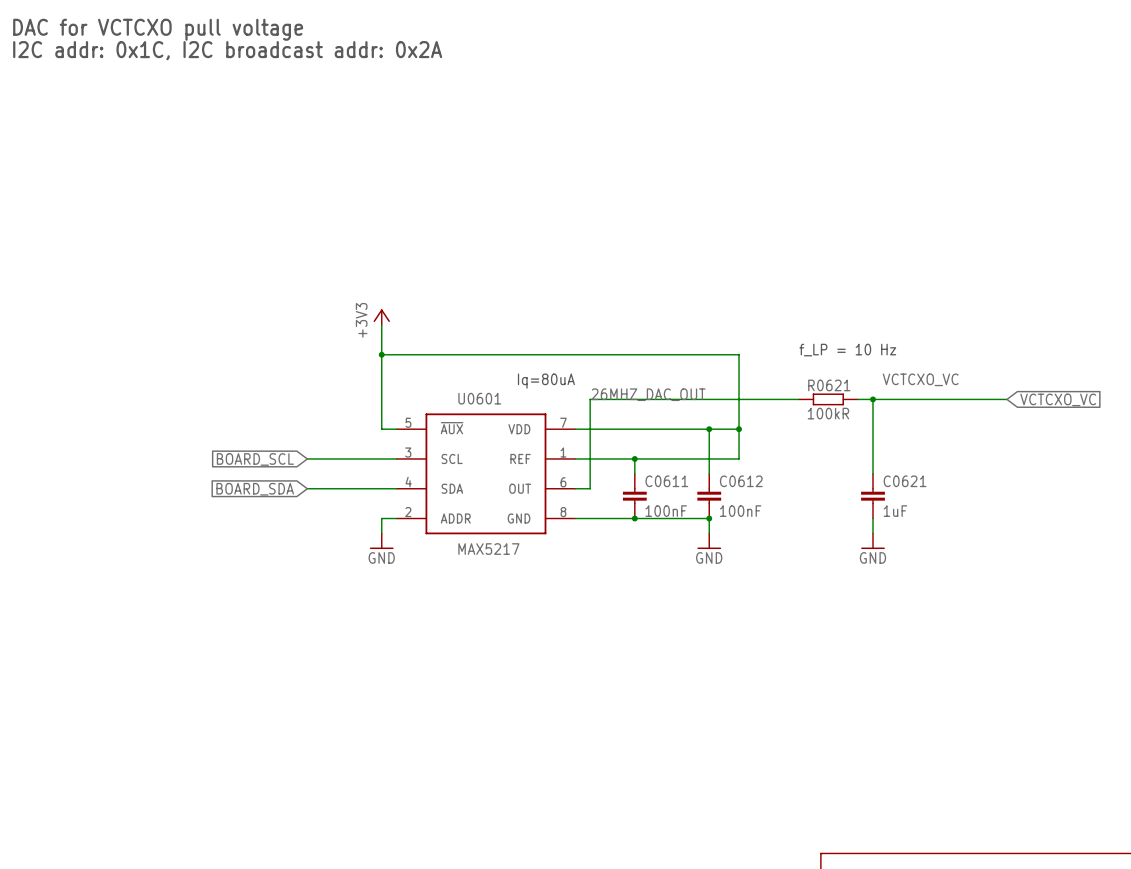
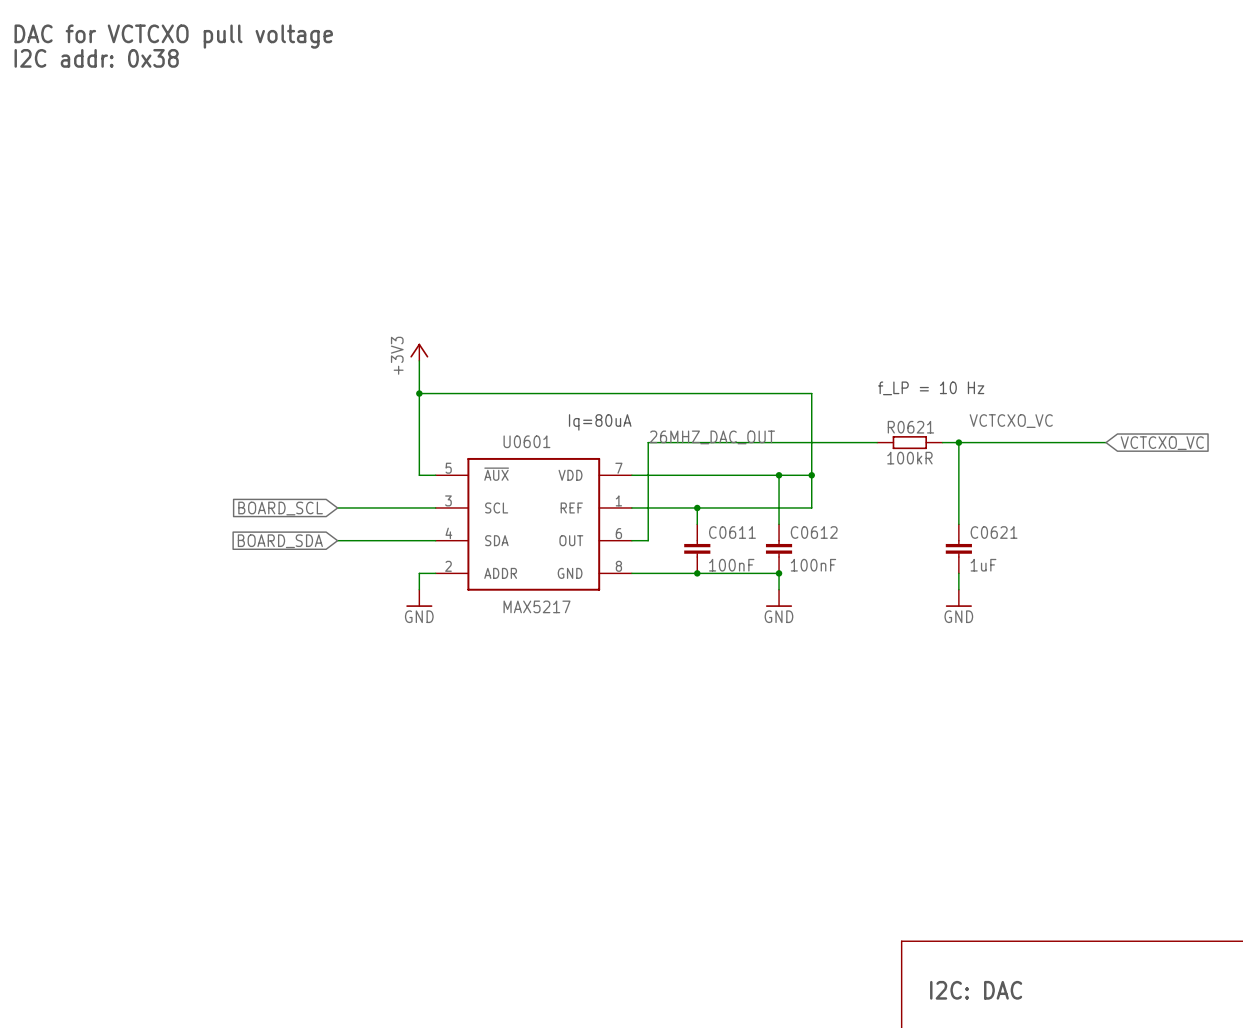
text: I2C addr: 0x1C, I2C broadcast addr: 0x2A (227, 50) -> I2C addr: 0x38 (96, 58)

